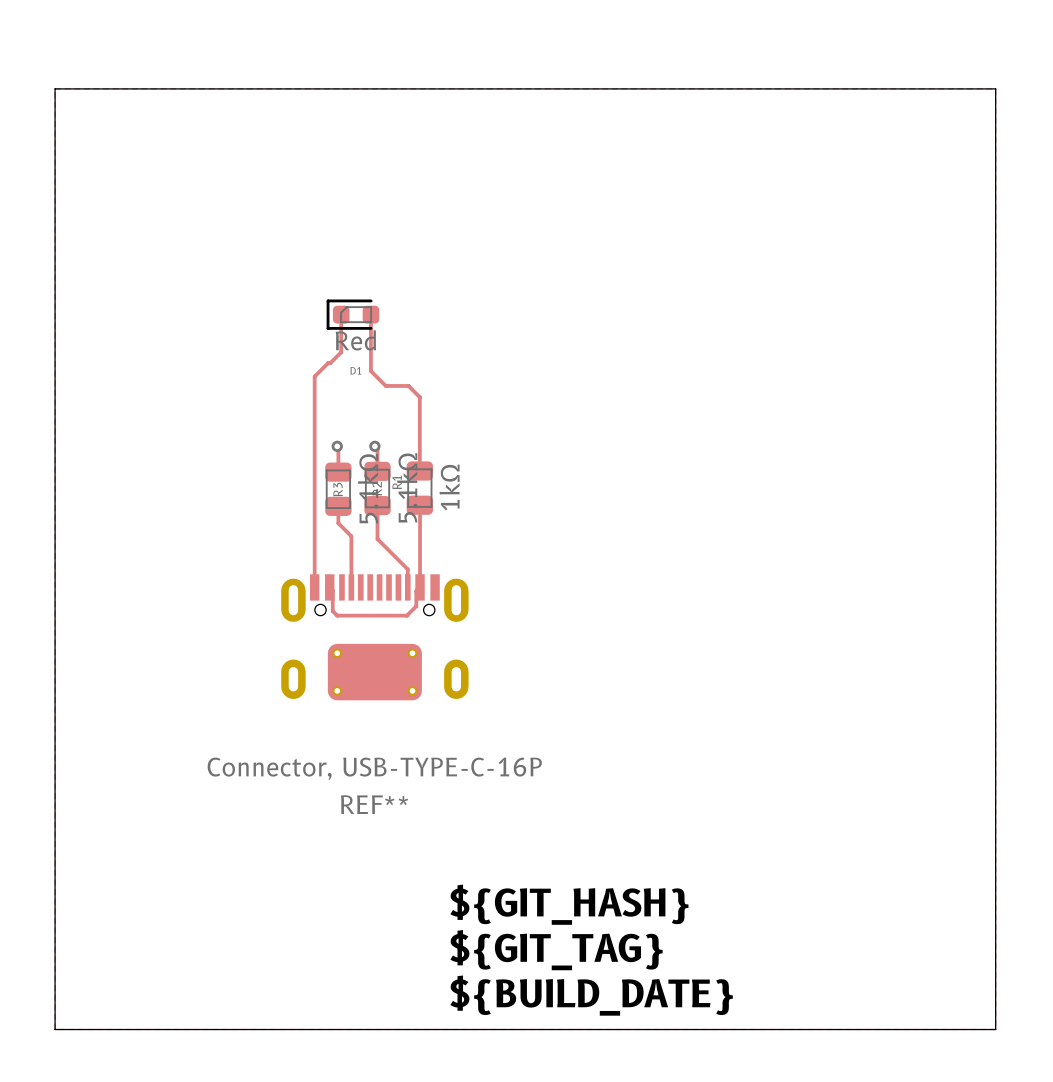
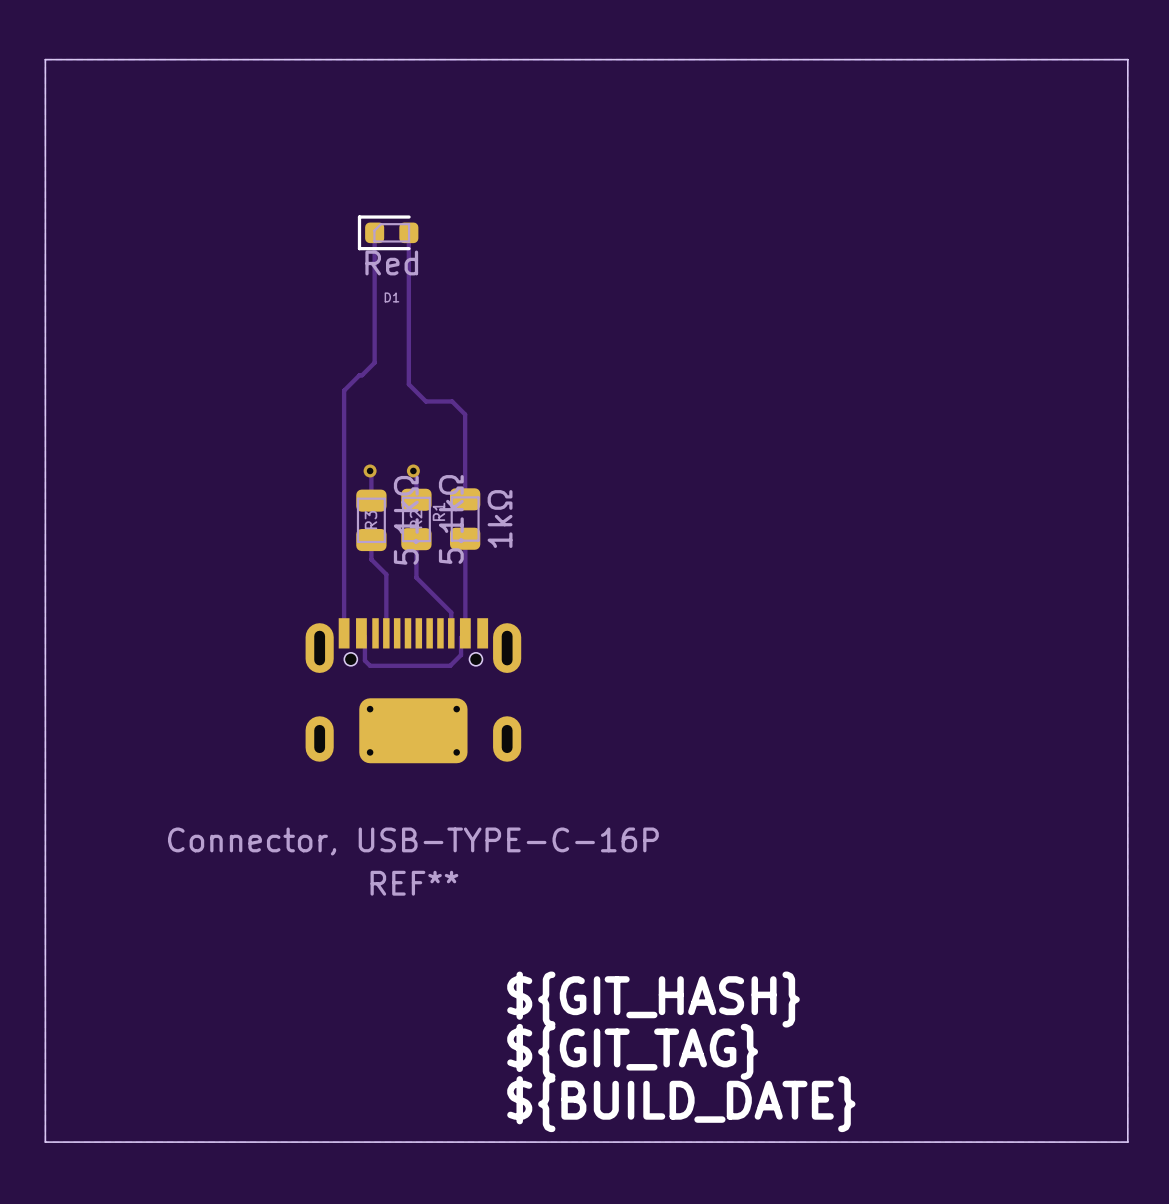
track: none -> (374, 232) (374, 319)
track: none -> (408, 232) (408, 319)
D1 position: (352, 314) -> (388, 232)

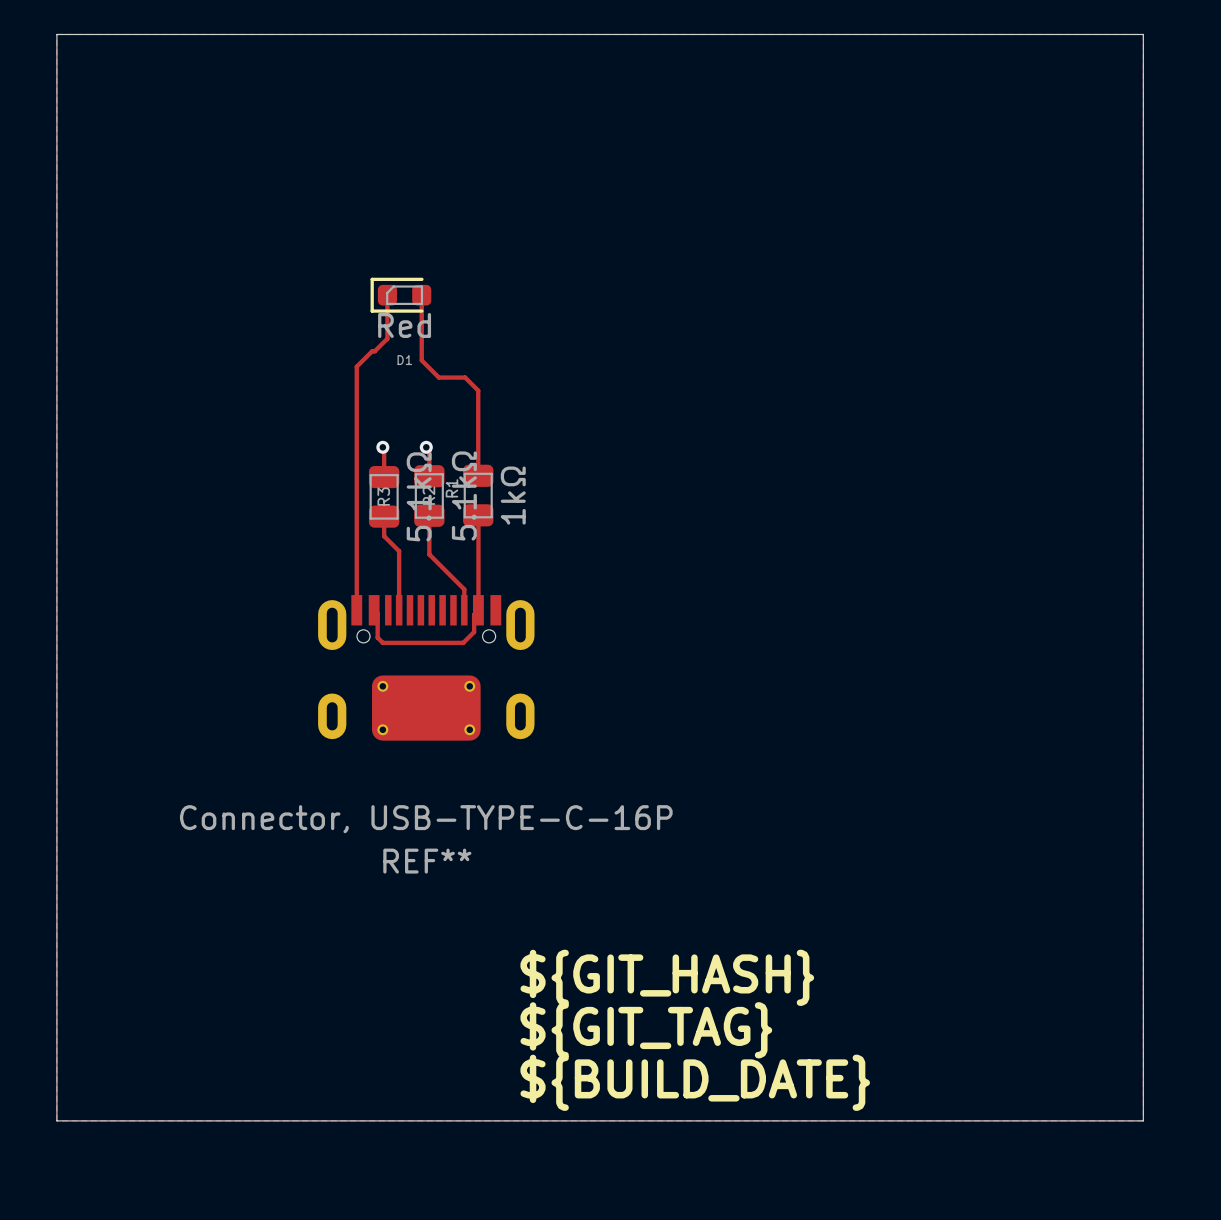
track: (374, 232) (374, 319) -> none
D1 position: (388, 232) -> (400, 295)
track: (408, 232) (408, 319) -> none

